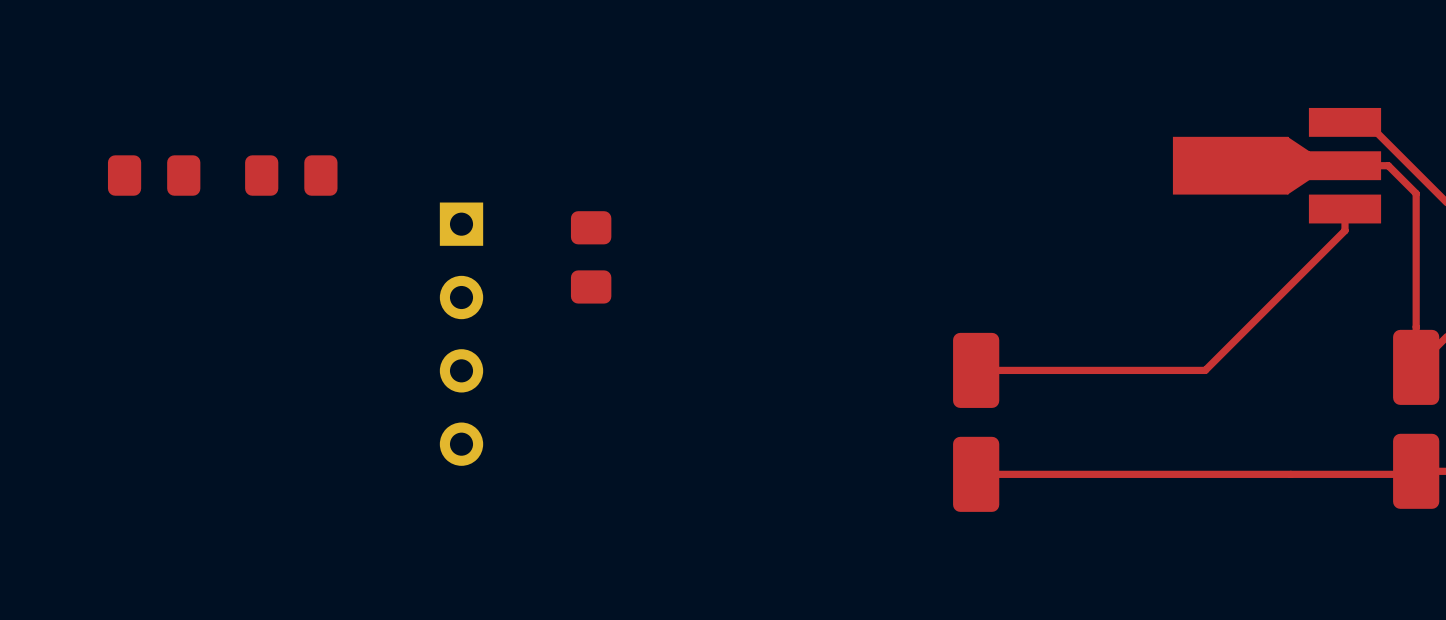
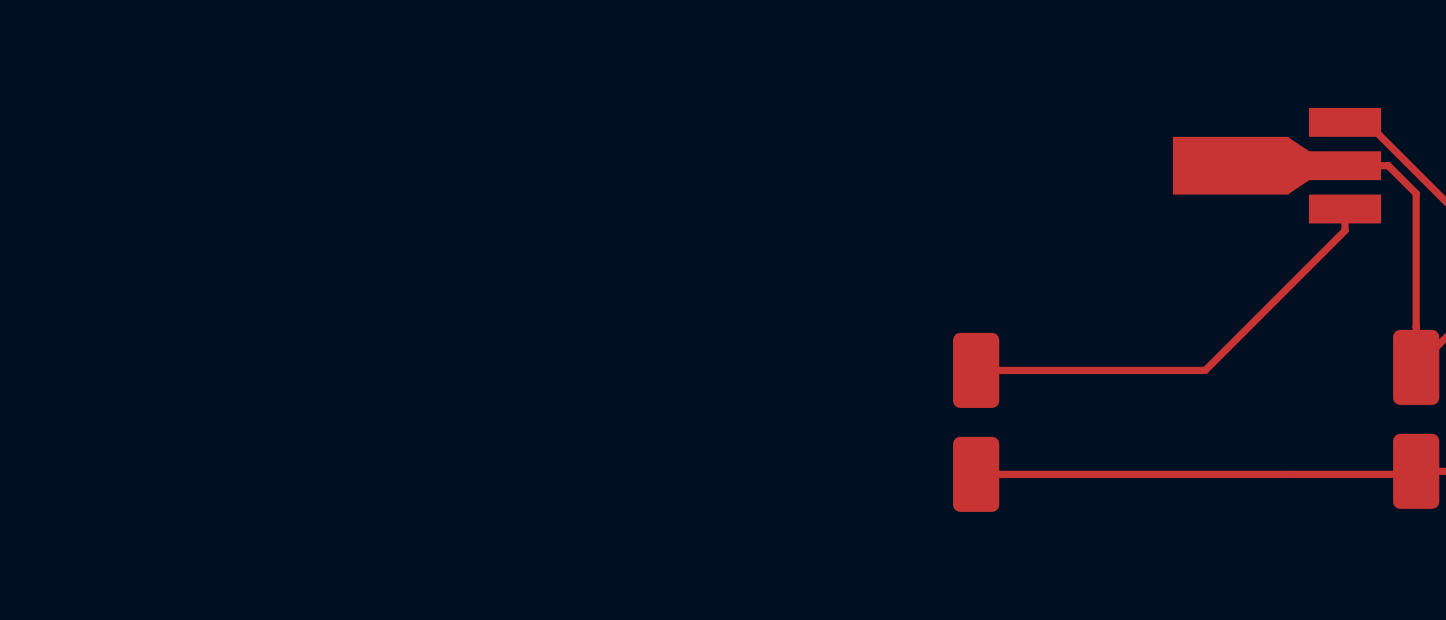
part: (154, 175) -> none
part: (291, 175) -> none
part: (591, 257) -> none
part: (461, 334) -> none

